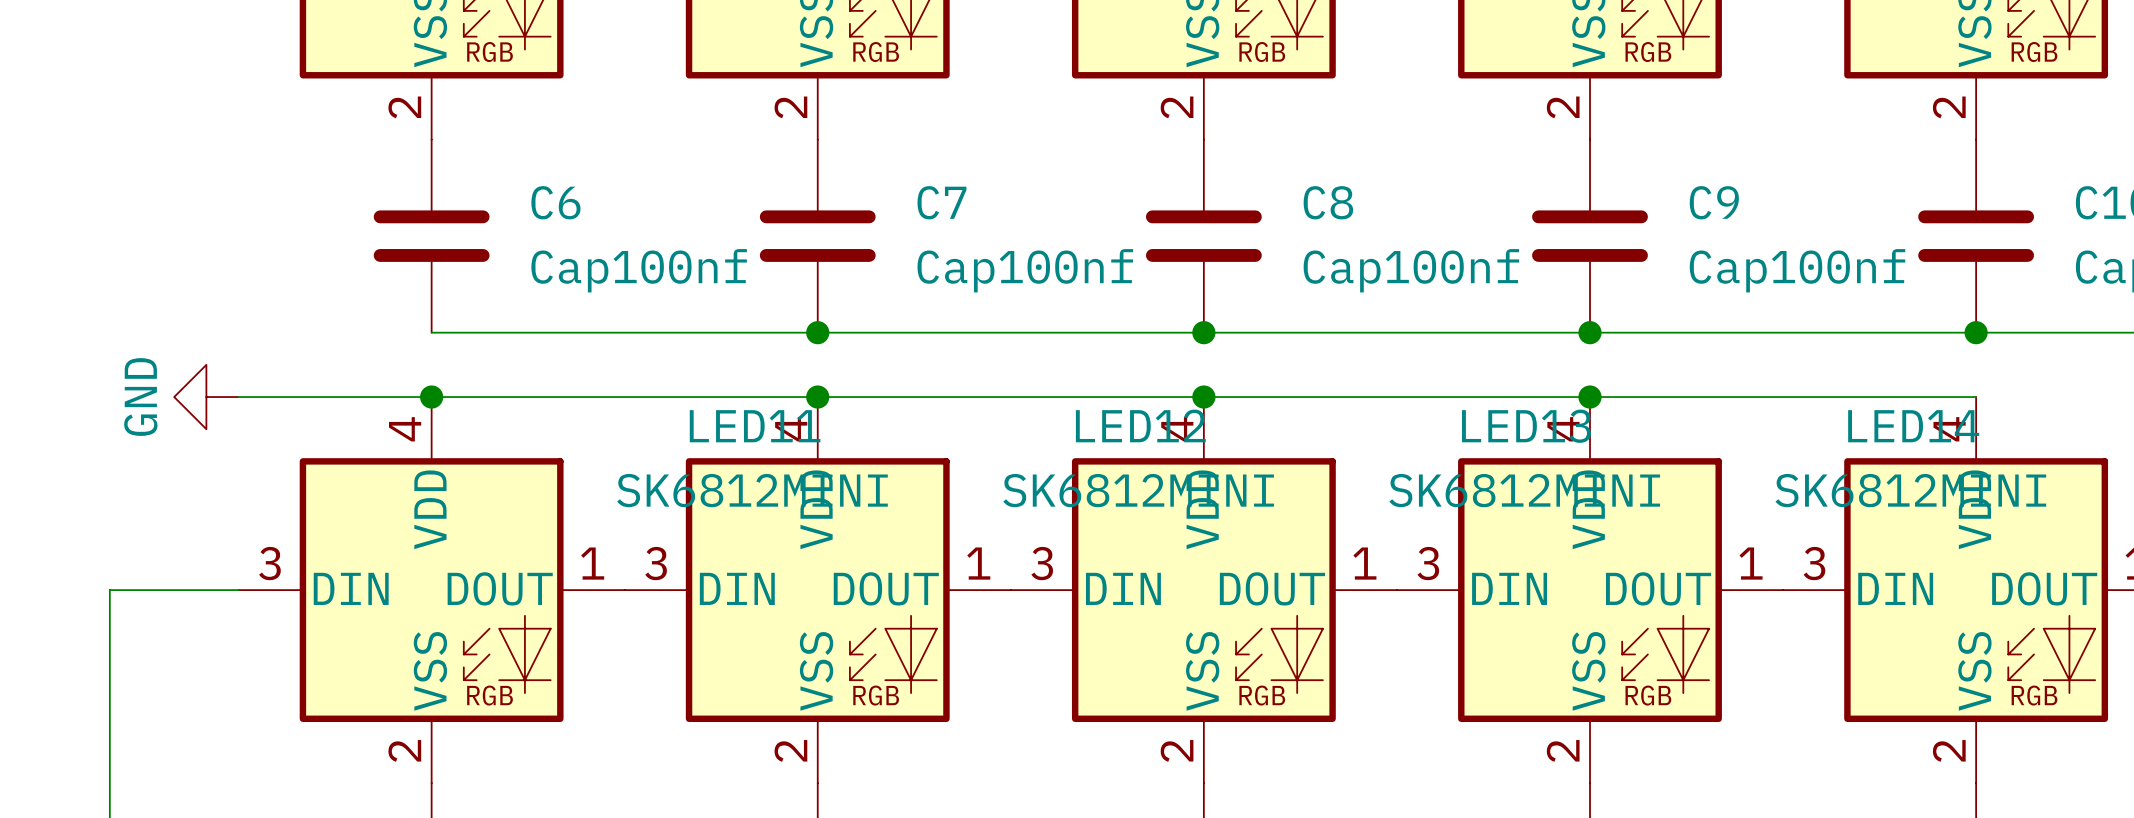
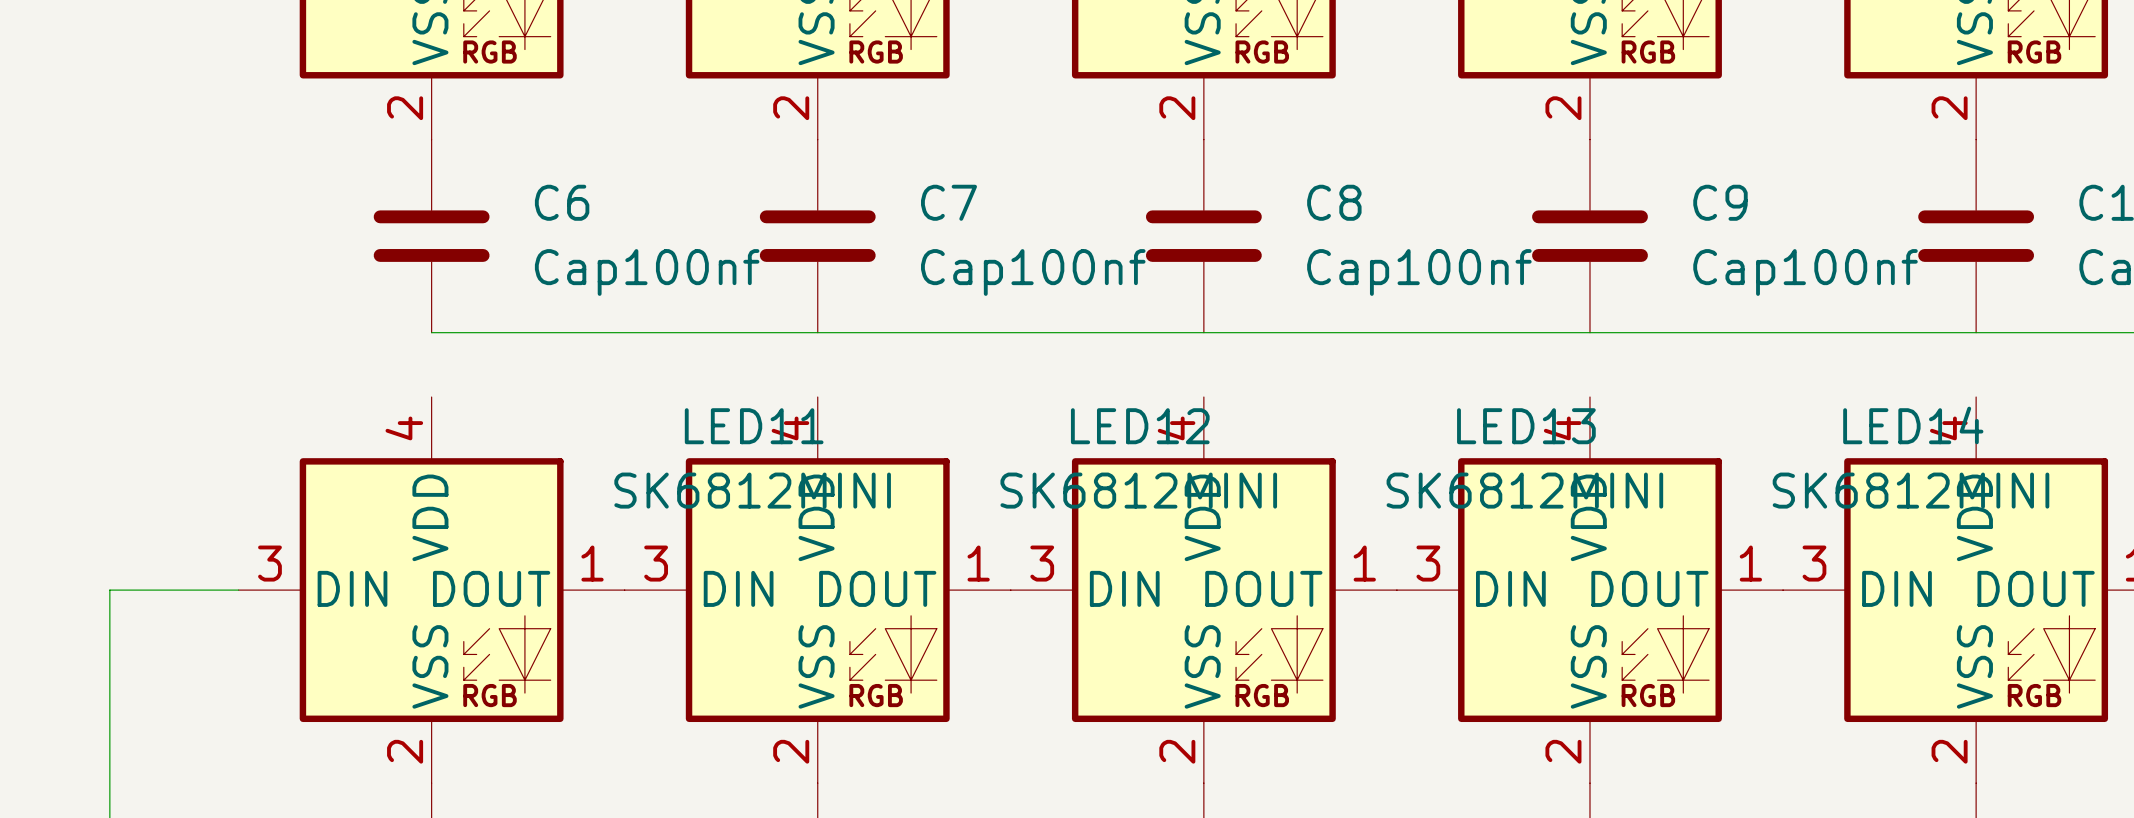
junction: (817, 332) -> none
junction: (1203, 332) -> none
junction: (1589, 332) -> none
junction: (1976, 332) -> none
power symbol: GND (206, 397) -> none
wire: (238, 397) (1976, 397) -> none
junction: (431, 397) -> none
junction: (817, 397) -> none
junction: (1203, 397) -> none
junction: (1589, 397) -> none

